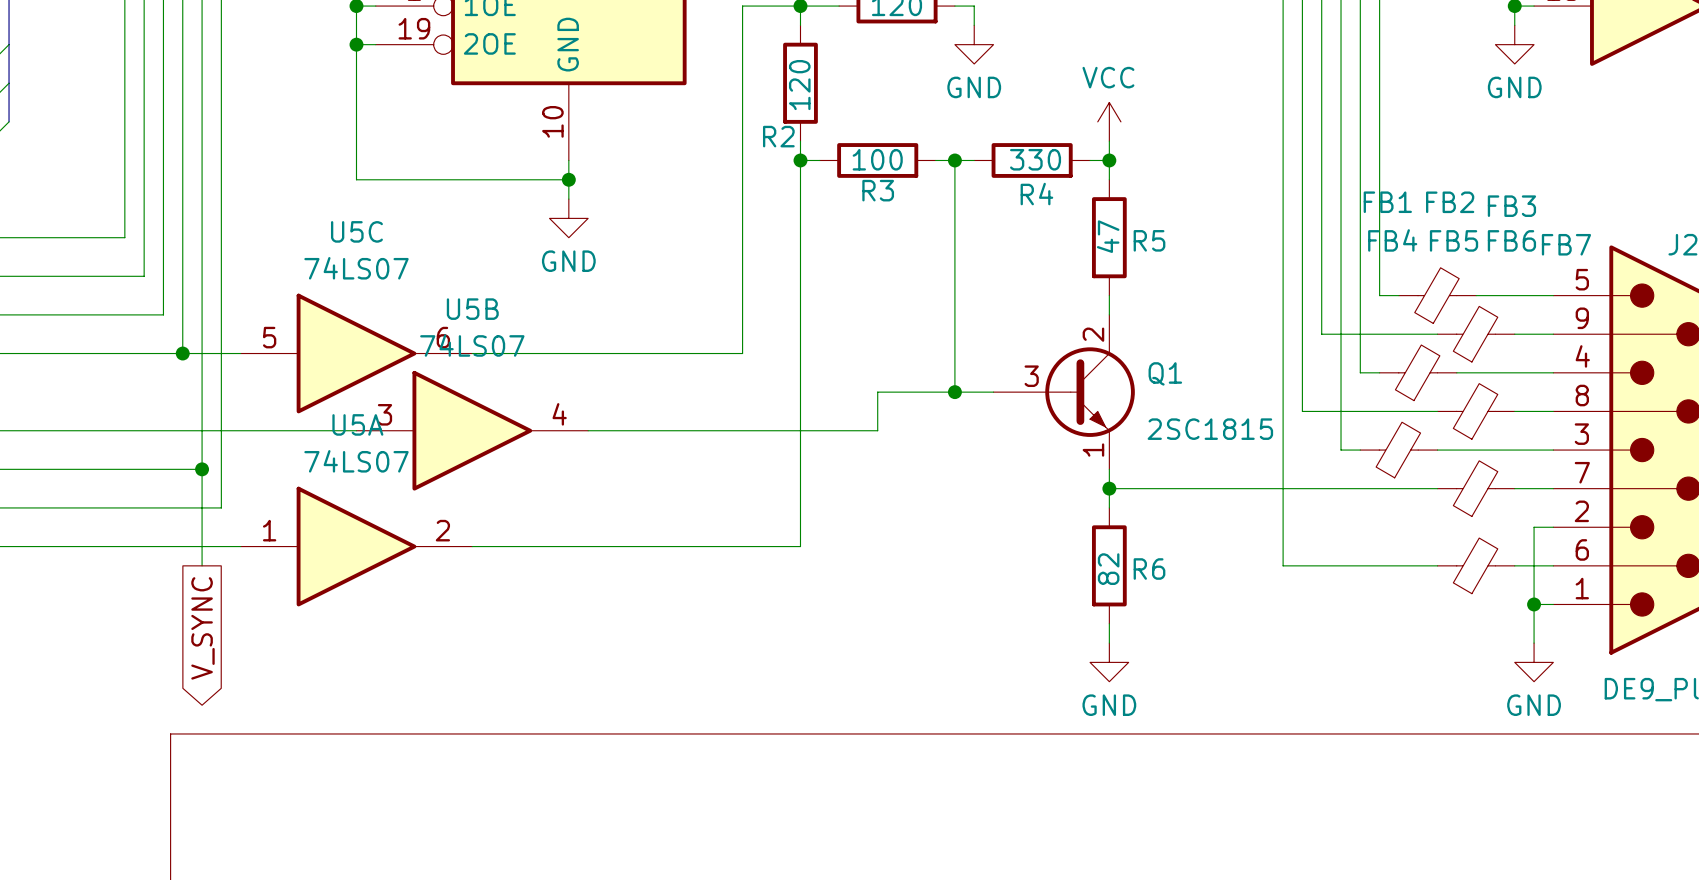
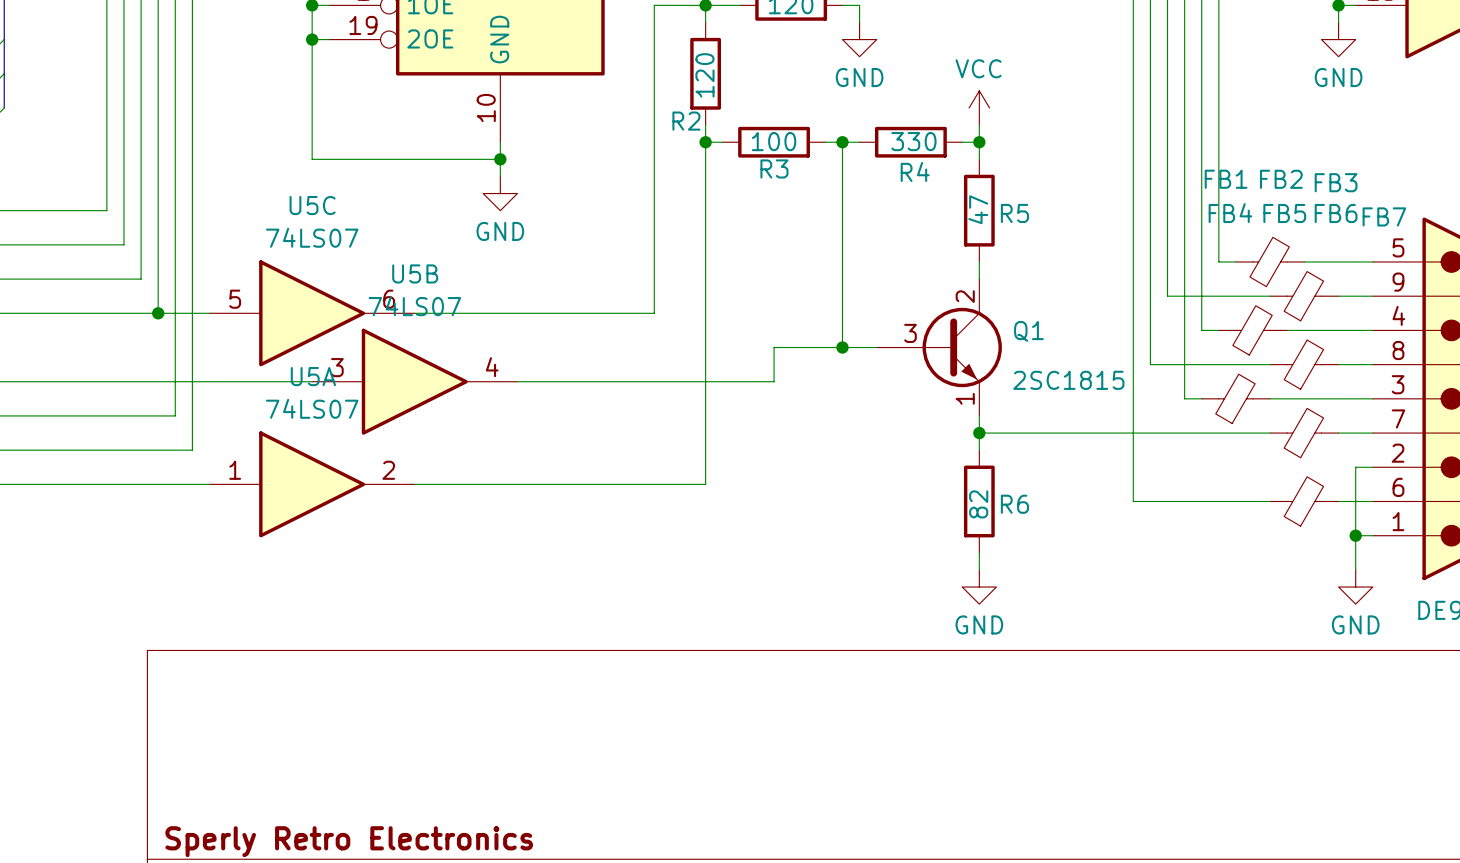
wire: (202, 469) (202, 565) -> none
junction: (202, 469) -> none
global label: V_SYNC (202, 628) -> none

